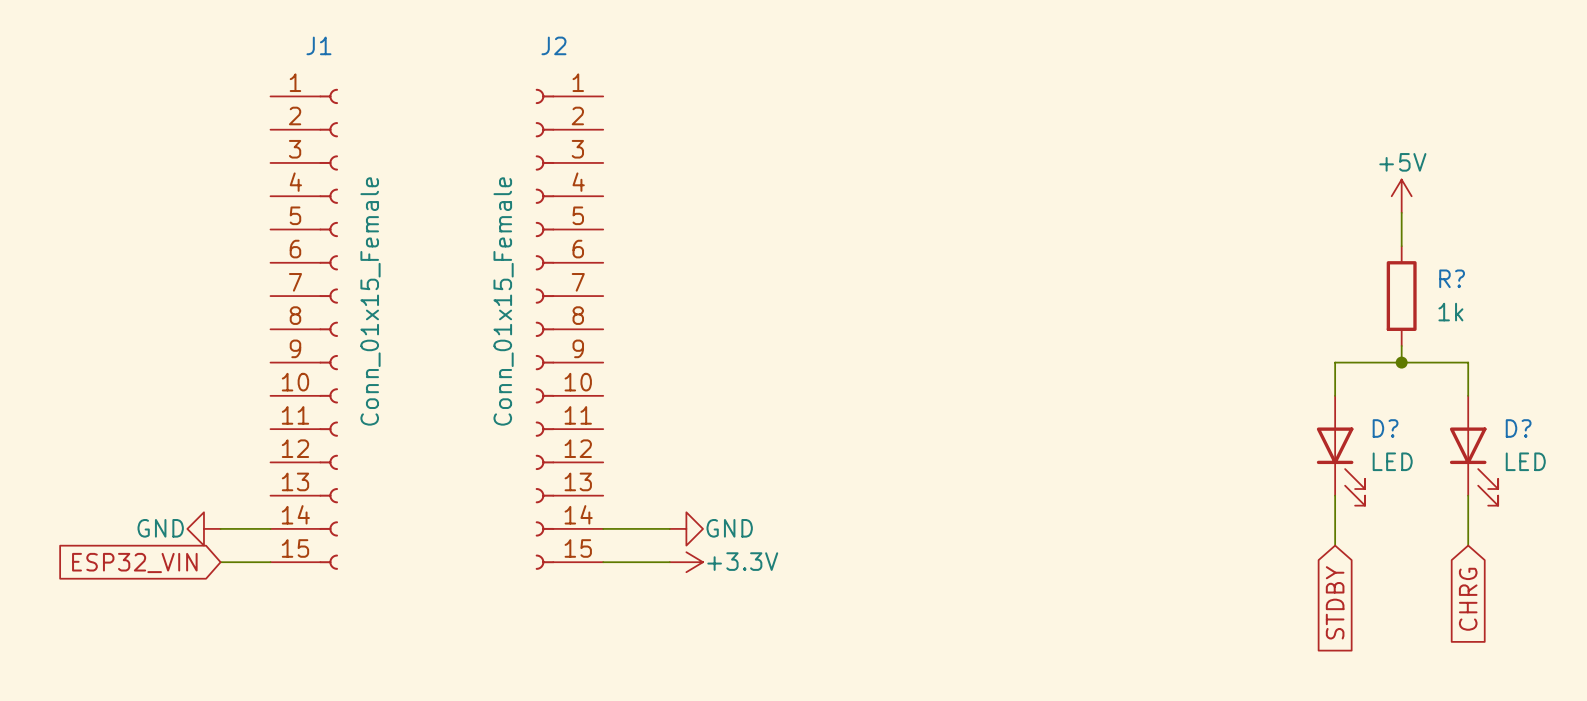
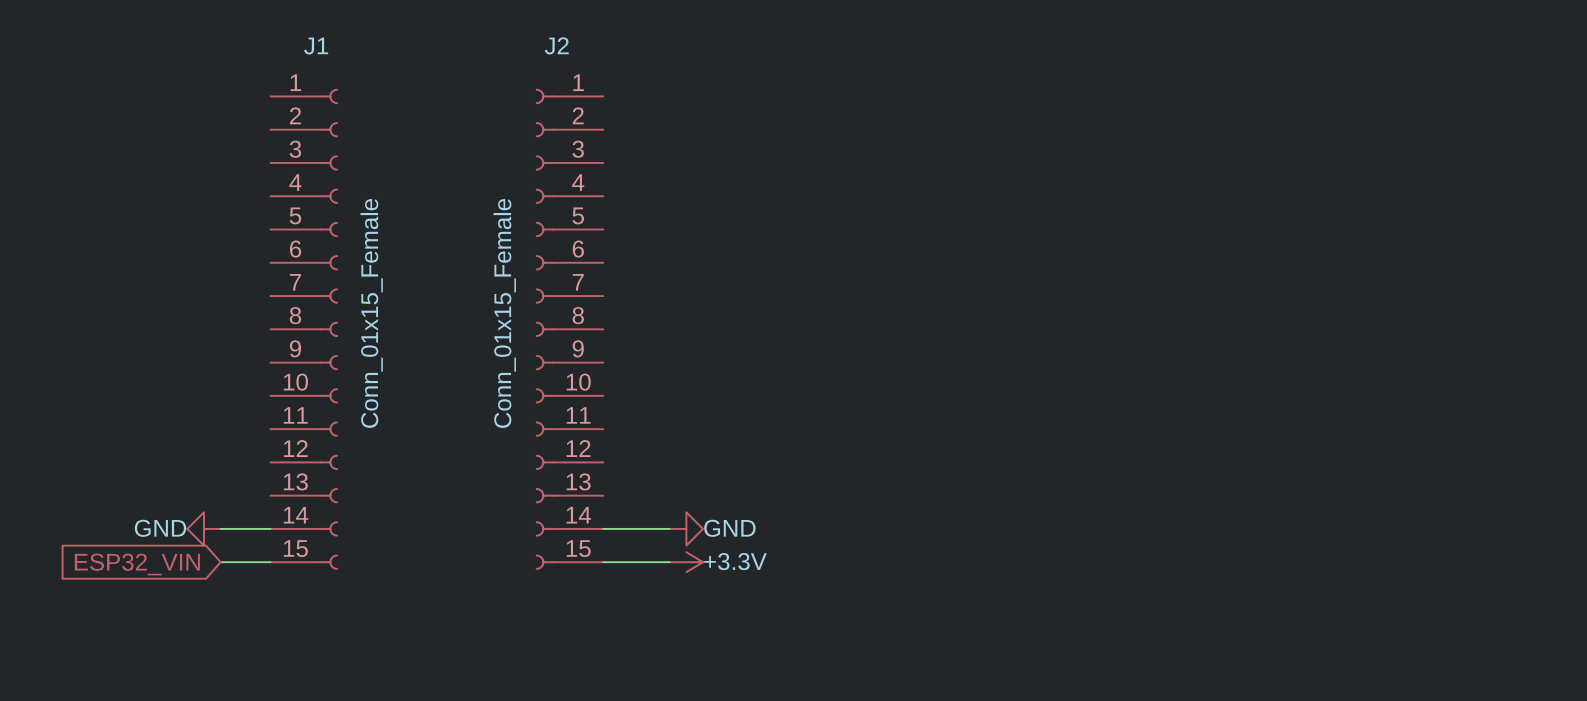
power symbol: +5V (1401, 196) -> none
wire: (1401, 212) (1401, 246) -> none
R?: 1k (1401, 296) -> none
wire: (1401, 345) (1401, 362) -> none
junction: (1401, 362) -> none
wire: (1335, 395) (1335, 362) (1468, 362) (1468, 395) -> none
D?: LED (1340, 450) -> none
D?: LED (1474, 450) -> none
wire: (1335, 495) (1335, 545) -> none
wire: (1468, 495) (1468, 545) -> none
global label: CHRG (1468, 599) -> none
global label: STDBY (1335, 602) -> none

